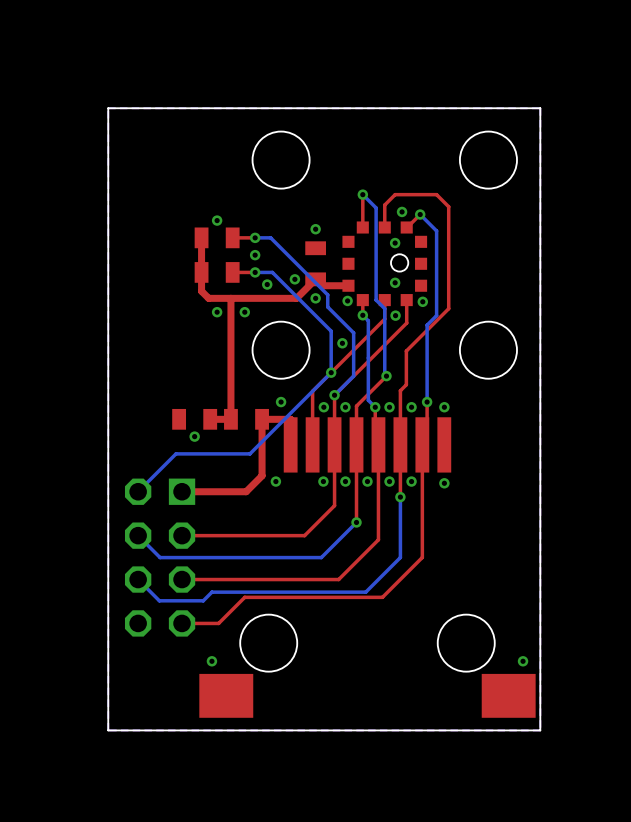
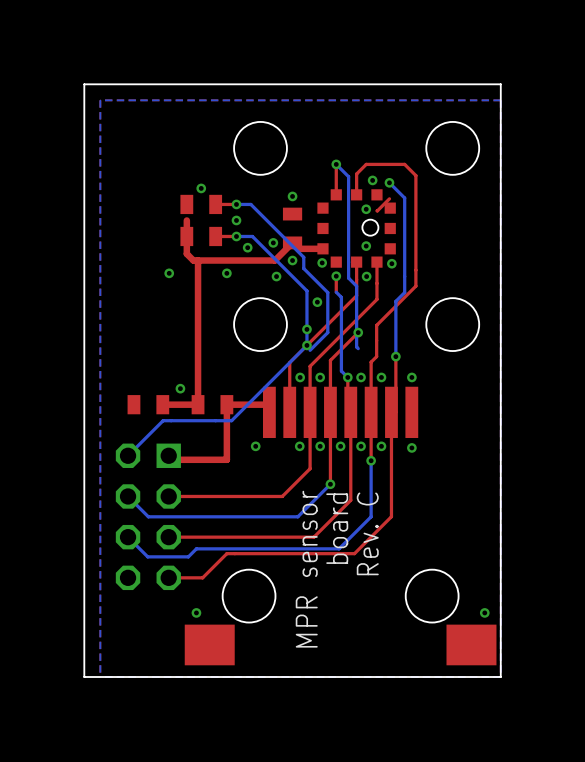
board edge: (540, 108) (108, 108) (108, 730) -> (500, 100) (500, 84) (84, 84) (84, 677) (100, 677)
top track: none -> (336, 164) (336, 180)
bottom track: (362, 194) (376, 207) -> (336, 164) (348, 176) (348, 192)
via position: (362, 194) -> (336, 164)
via: none -> (372, 180)
via: none -> (389, 182)
top track: (384, 205) (395, 194) (436, 194) (448, 206) -> (356, 190) (356, 174) (366, 164) (404, 164) (415, 175) (415, 191)
top track: (362, 210) (362, 227) -> (356, 262) (356, 278)
top track: (384, 210) (384, 227) -> (376, 262) (376, 278)
via: (402, 211) -> none
bottom track: (420, 214) (436, 230) -> (389, 182) (404, 198) (404, 214)
via: (420, 214) -> none
part: none -> (201, 204)
via position: (217, 220) -> (201, 188)
via: none -> (236, 204)
via: none -> (366, 209)
via position: (315, 229) -> (292, 196)
part: (217, 237) -> none
top track: (255, 237) (232, 237) -> (236, 204) (215, 204)
bottom track: (255, 237) (270, 237) (327, 294) (327, 306) (353, 332) -> (236, 204) (250, 204) (303, 257) (303, 268) (327, 292) (327, 308)
via: (395, 243) -> none
part: none -> (201, 236)
via: none -> (273, 242)
part position: (315, 263) -> (292, 228)
part position: (384, 263) -> (356, 228)
via: none -> (366, 246)
via: none -> (247, 247)
part: (217, 272) -> none
top track: (255, 272) (232, 272) -> (236, 236) (215, 236)
bottom track: (255, 272) (272, 272) (331, 331) -> (236, 236) (252, 236) (306, 290) (306, 306)
via: (255, 272) -> none
top track: (201, 273) (201, 291) (208, 298) (296, 298) (315, 279) (322, 285) (348, 285) -> (186, 253) (193, 260) (274, 260) (292, 242) (298, 248) (322, 248)
via: (294, 279) -> none
top track: none -> (198, 260) (198, 404) (162, 404)
via: none -> (292, 260)
via: (395, 282) -> none
via: none -> (322, 262)
via: (267, 284) -> none
via: none -> (391, 263)
via: none -> (169, 273)
via: none -> (226, 273)
top track: (230, 298) (230, 419) (210, 419) -> none
via: none -> (276, 276)
via: (315, 298) -> none
via: none -> (336, 276)
via: none -> (366, 276)
via: (347, 300) -> none
via: (422, 301) -> none
via: (217, 312) -> none
via: (244, 312) -> none
via: (362, 315) -> none
via: (395, 315) -> none
via: none -> (317, 302)
via: (342, 343) -> none
via: none -> (306, 329)
bottom track: (353, 358) (353, 376) (334, 395) -> (327, 332) (310, 350)
top track: (386, 376) (356, 406) -> (358, 332) (330, 360) (330, 376)
via position: (386, 376) -> (358, 332)
top track: none -> (395, 356) (395, 372)
bottom track: (427, 384) (427, 402) -> none
via: (334, 395) -> none
via: (281, 402) -> none
via position: (427, 402) -> (395, 356)
part: (194, 419) -> none
part: (246, 419) -> none
part: none -> (148, 404)
via position: (194, 436) -> (180, 388)
part: none -> (212, 404)
top track: (290, 436) (290, 419) (262, 419) (262, 475) (246, 491) (182, 491) -> (269, 404) (226, 404) (226, 459) (172, 459)
text: none -> board (337, 528)
text: none -> Rev. C (367, 533)
text: none -> MPR sensor (306, 569)

